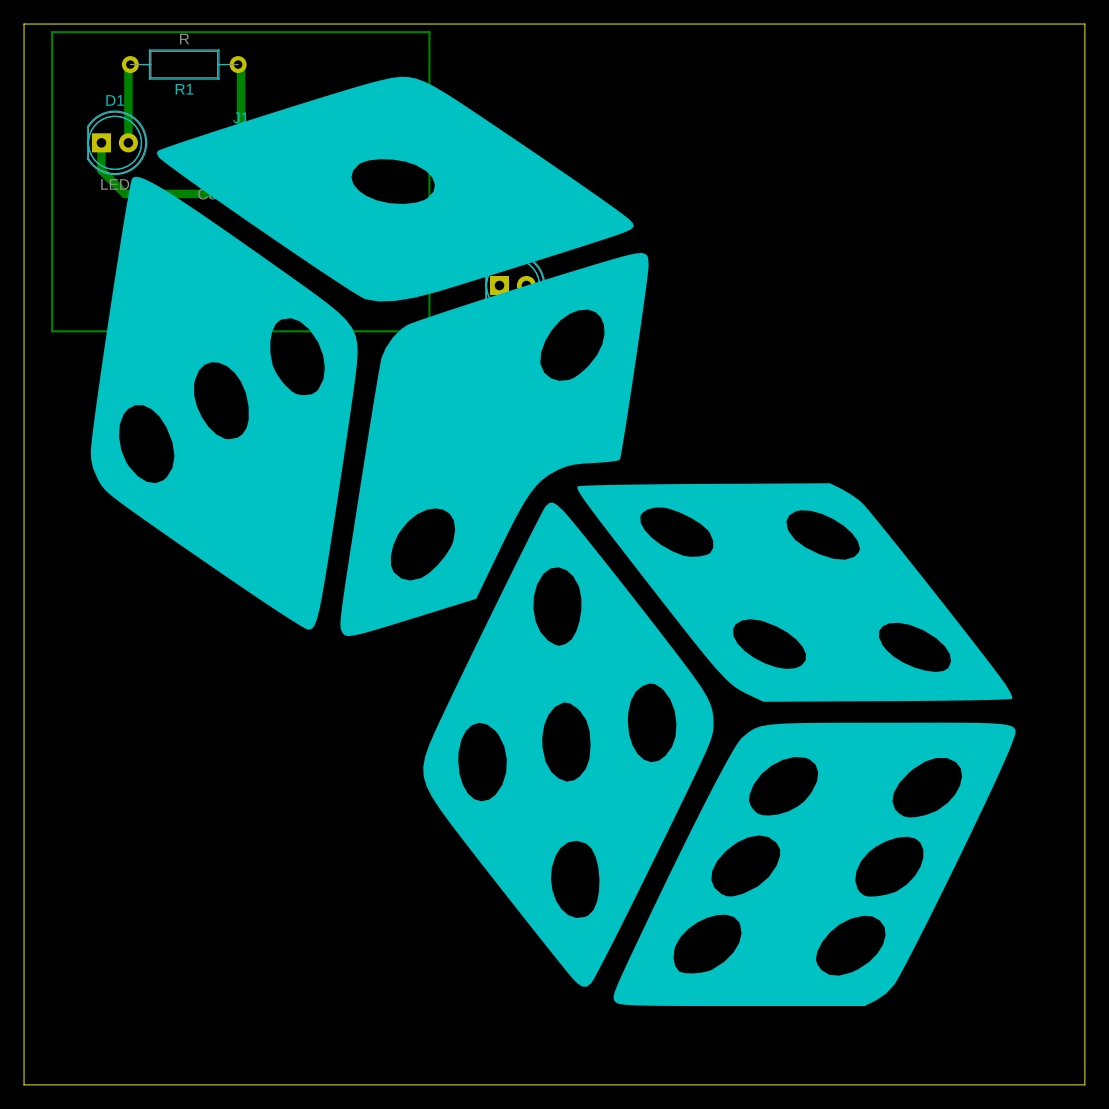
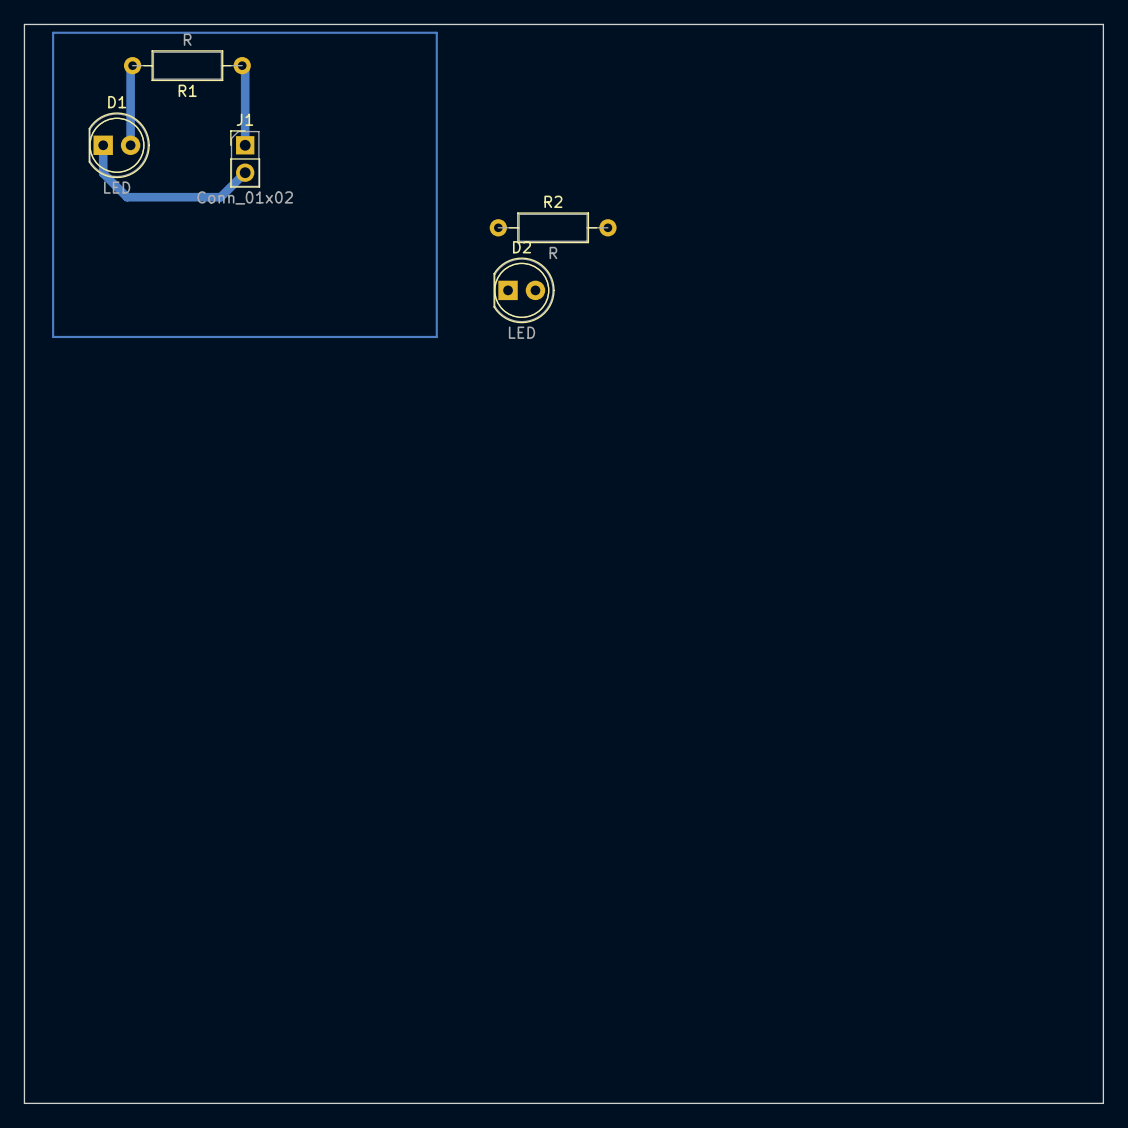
part: (553, 541) -> none

